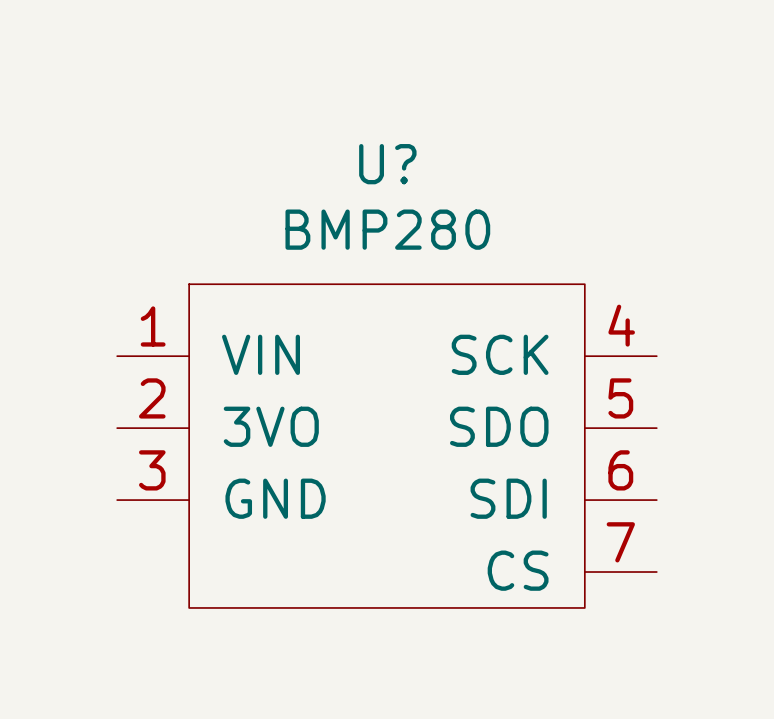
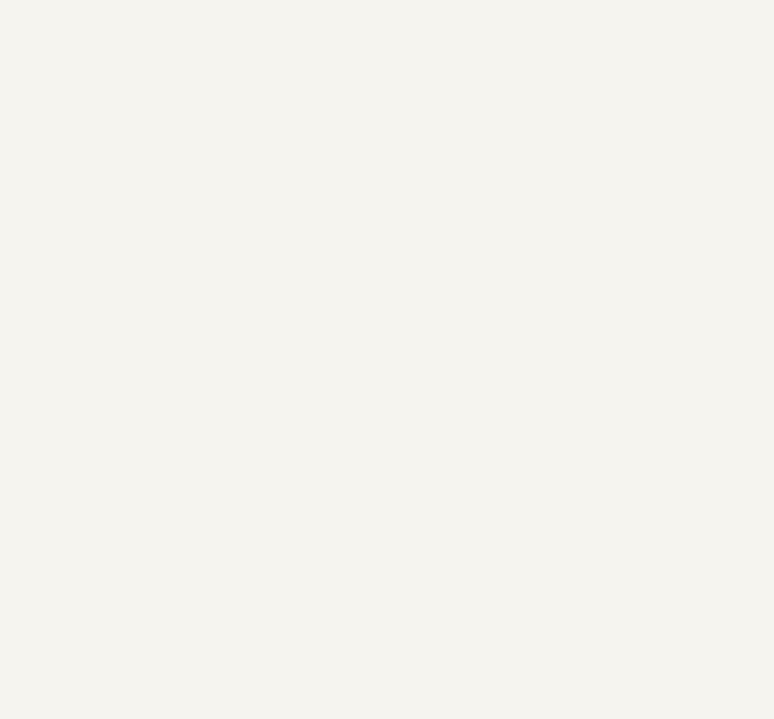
U?: BMP280 (386, 446) -> none

